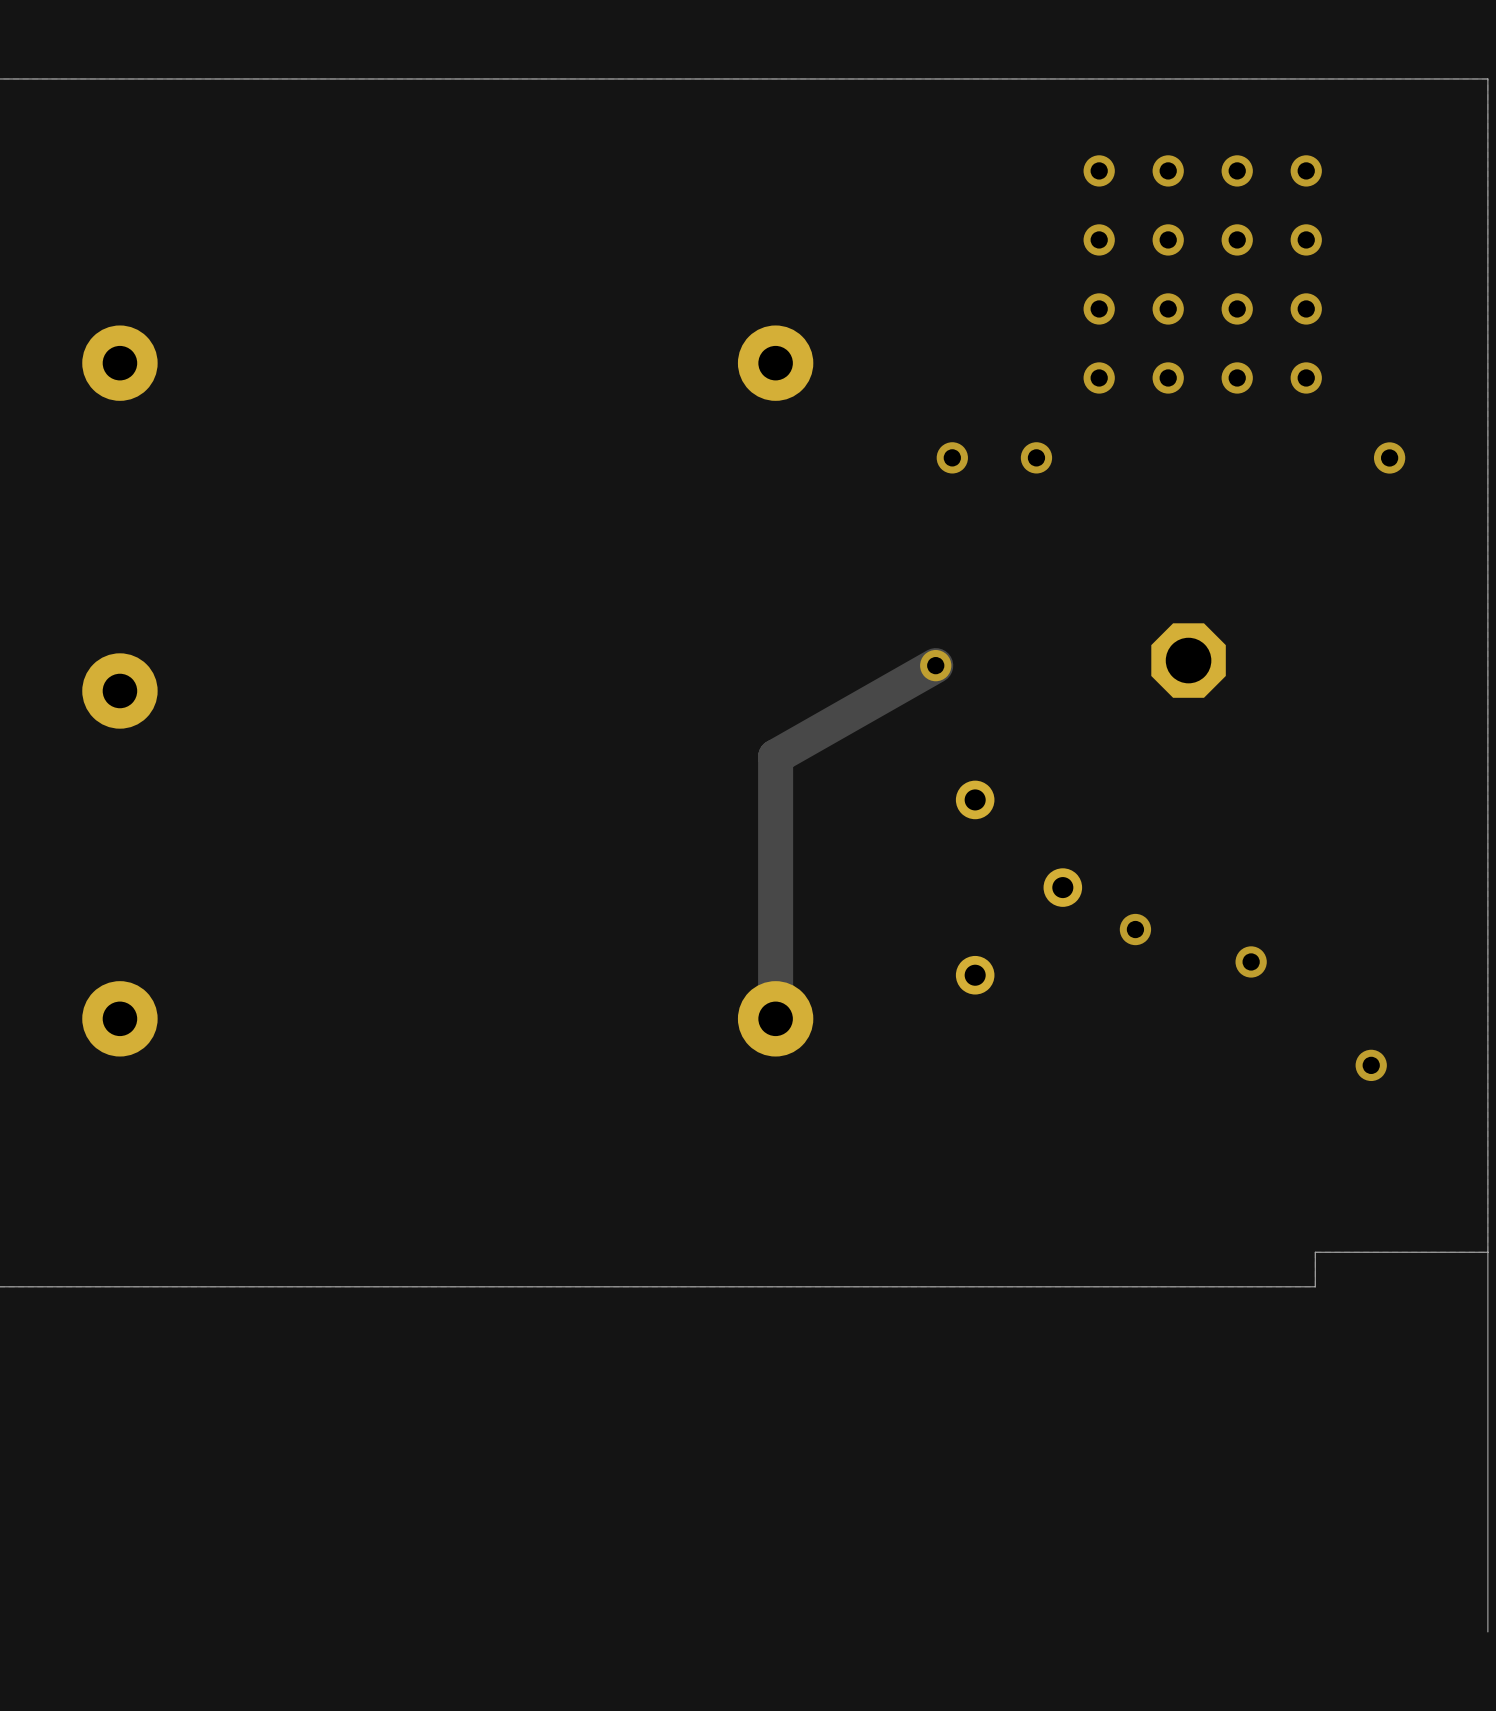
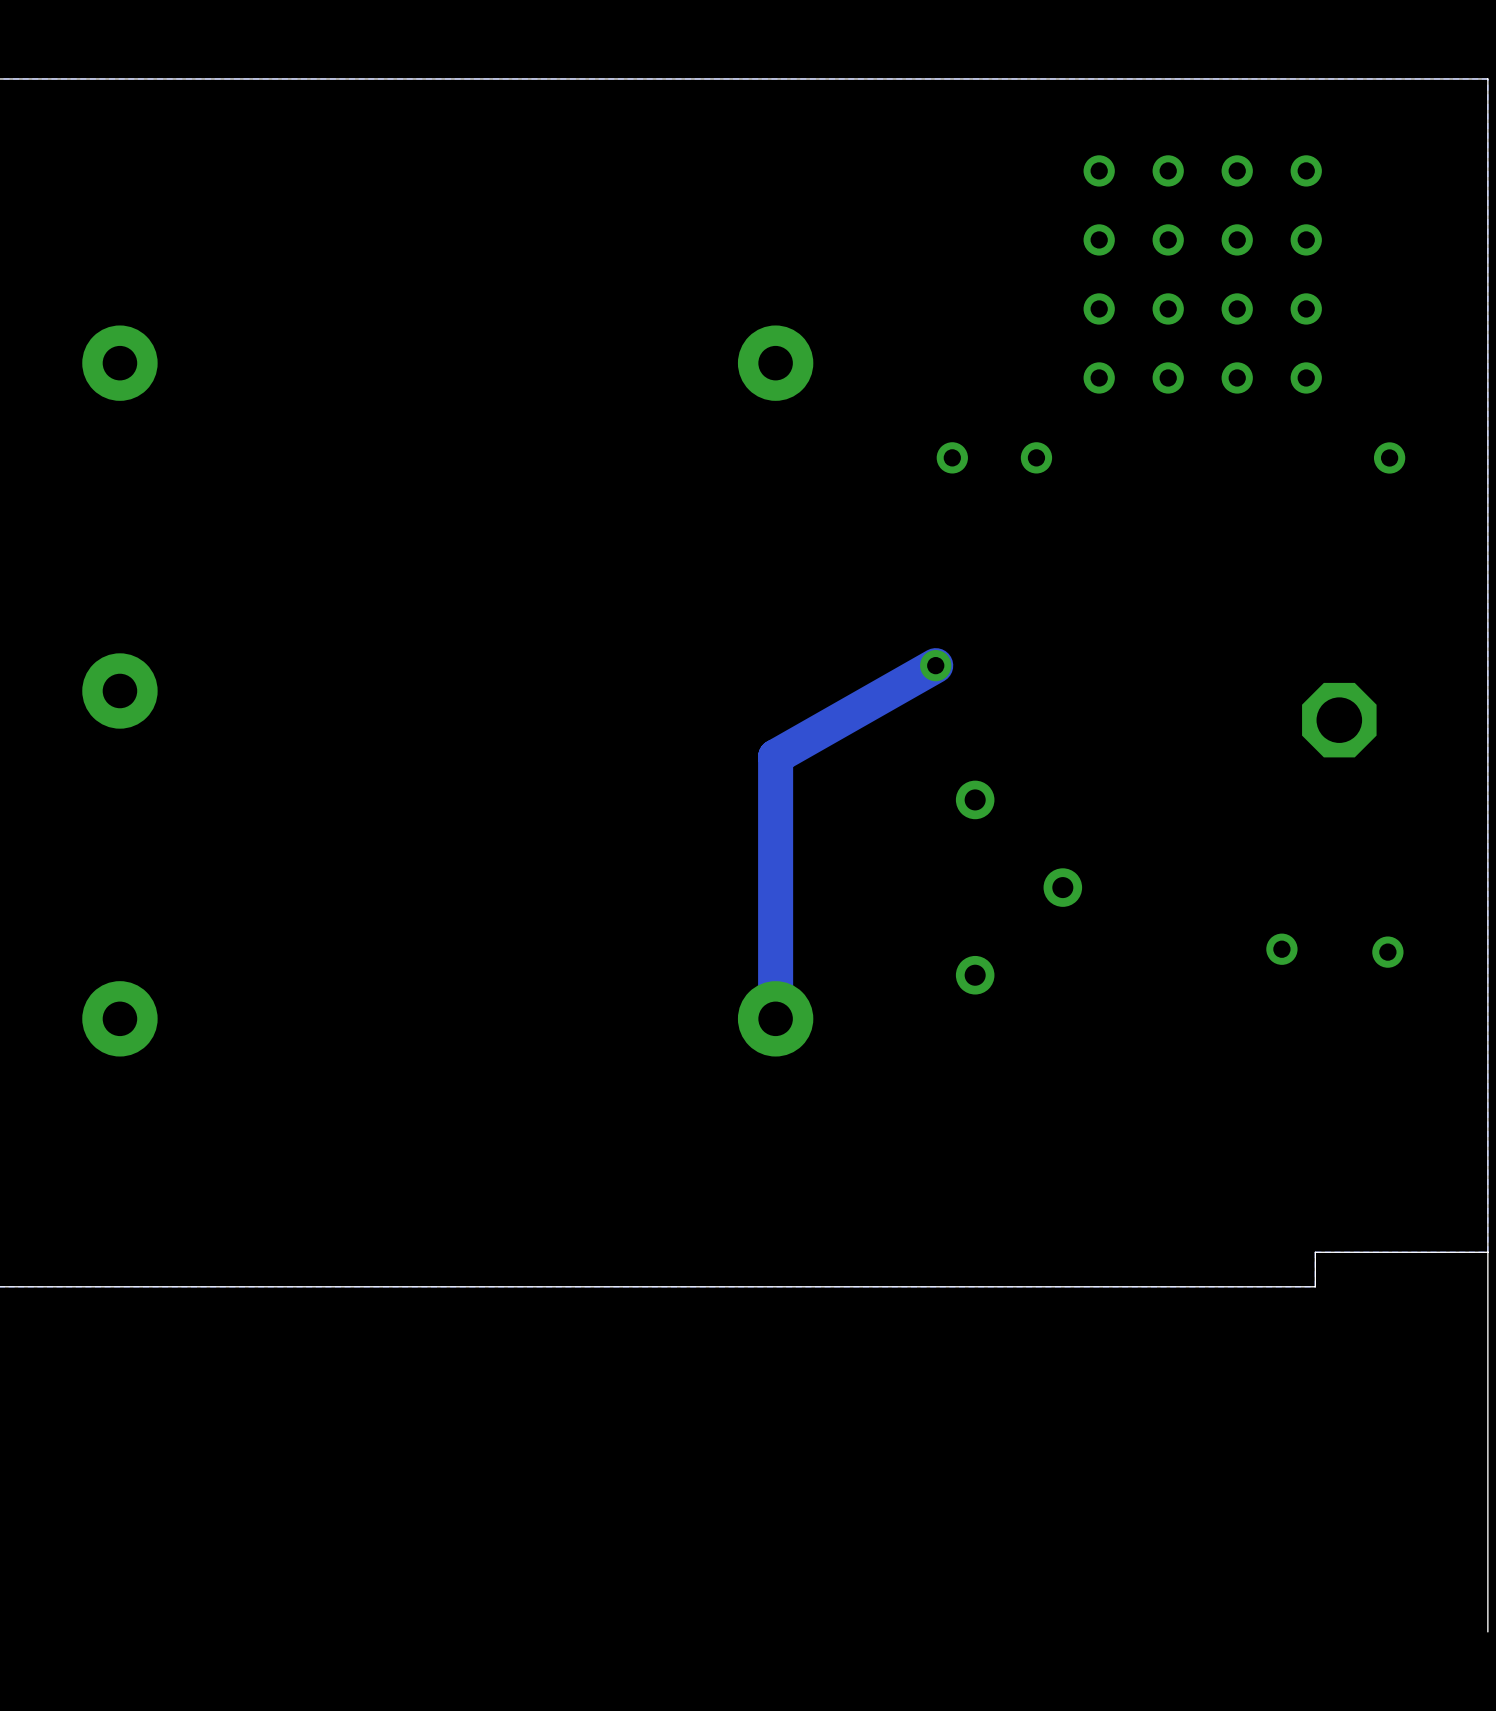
part position: (1188, 660) -> (1339, 720)
via: (1135, 929) -> none
via: none -> (1387, 952)
via position: (1251, 961) -> (1281, 949)
via: (1371, 1065) -> none

